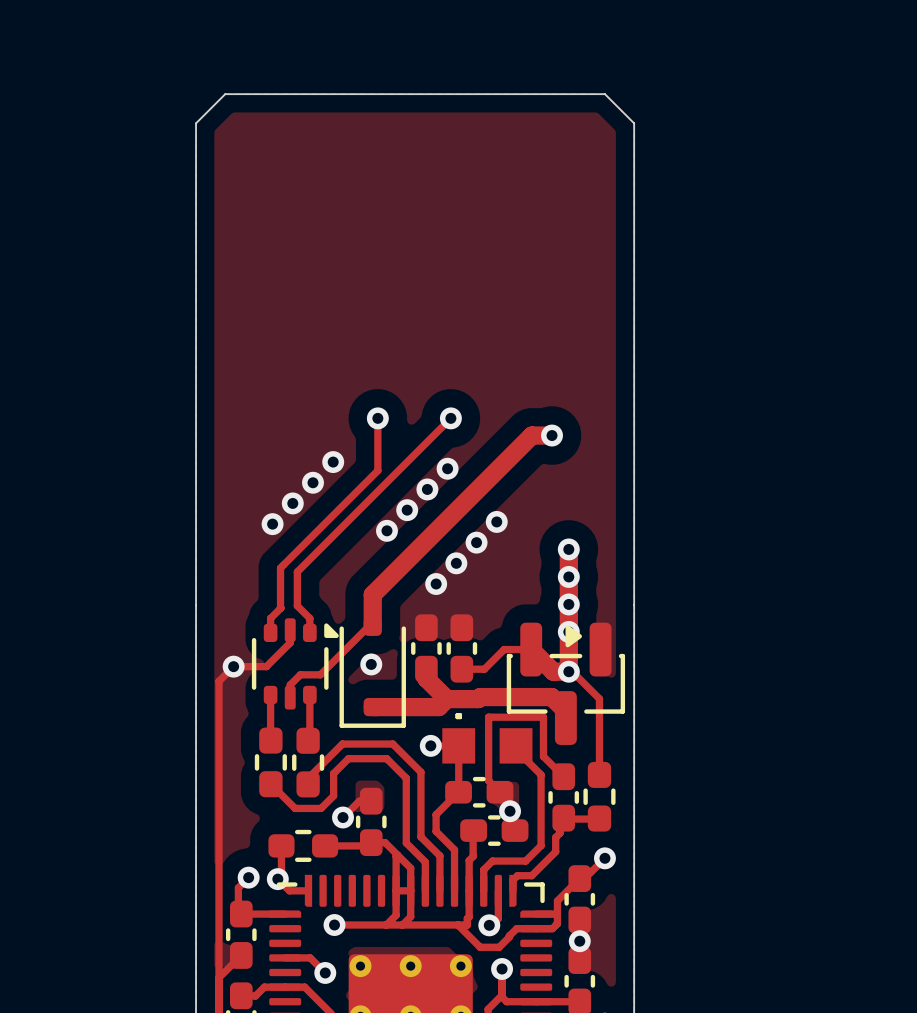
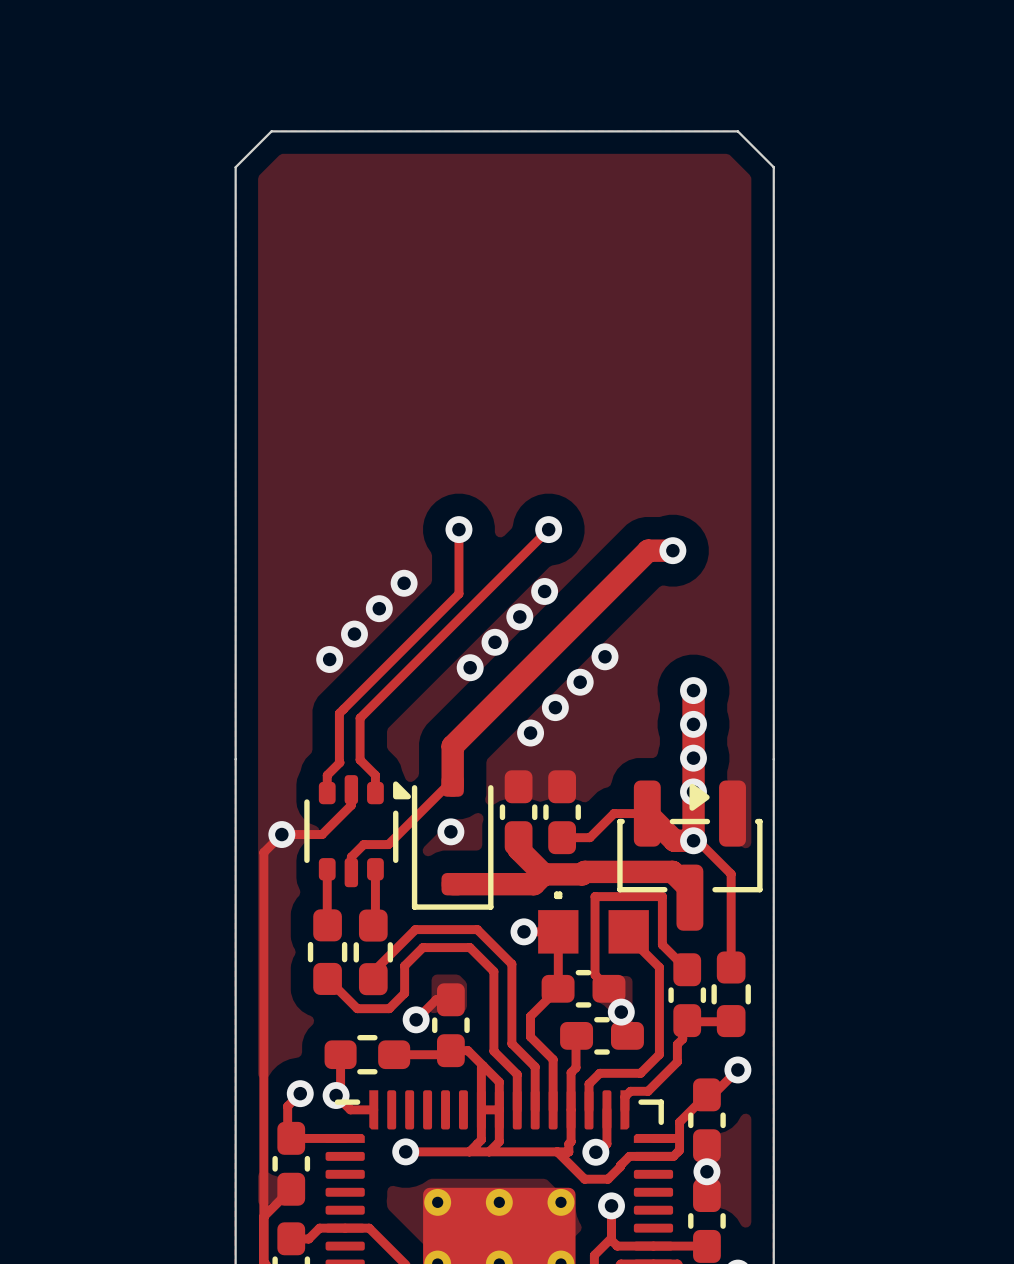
track: (285, 957) (310, 957) (325, 972) -> none
via: (325, 972) -> none

